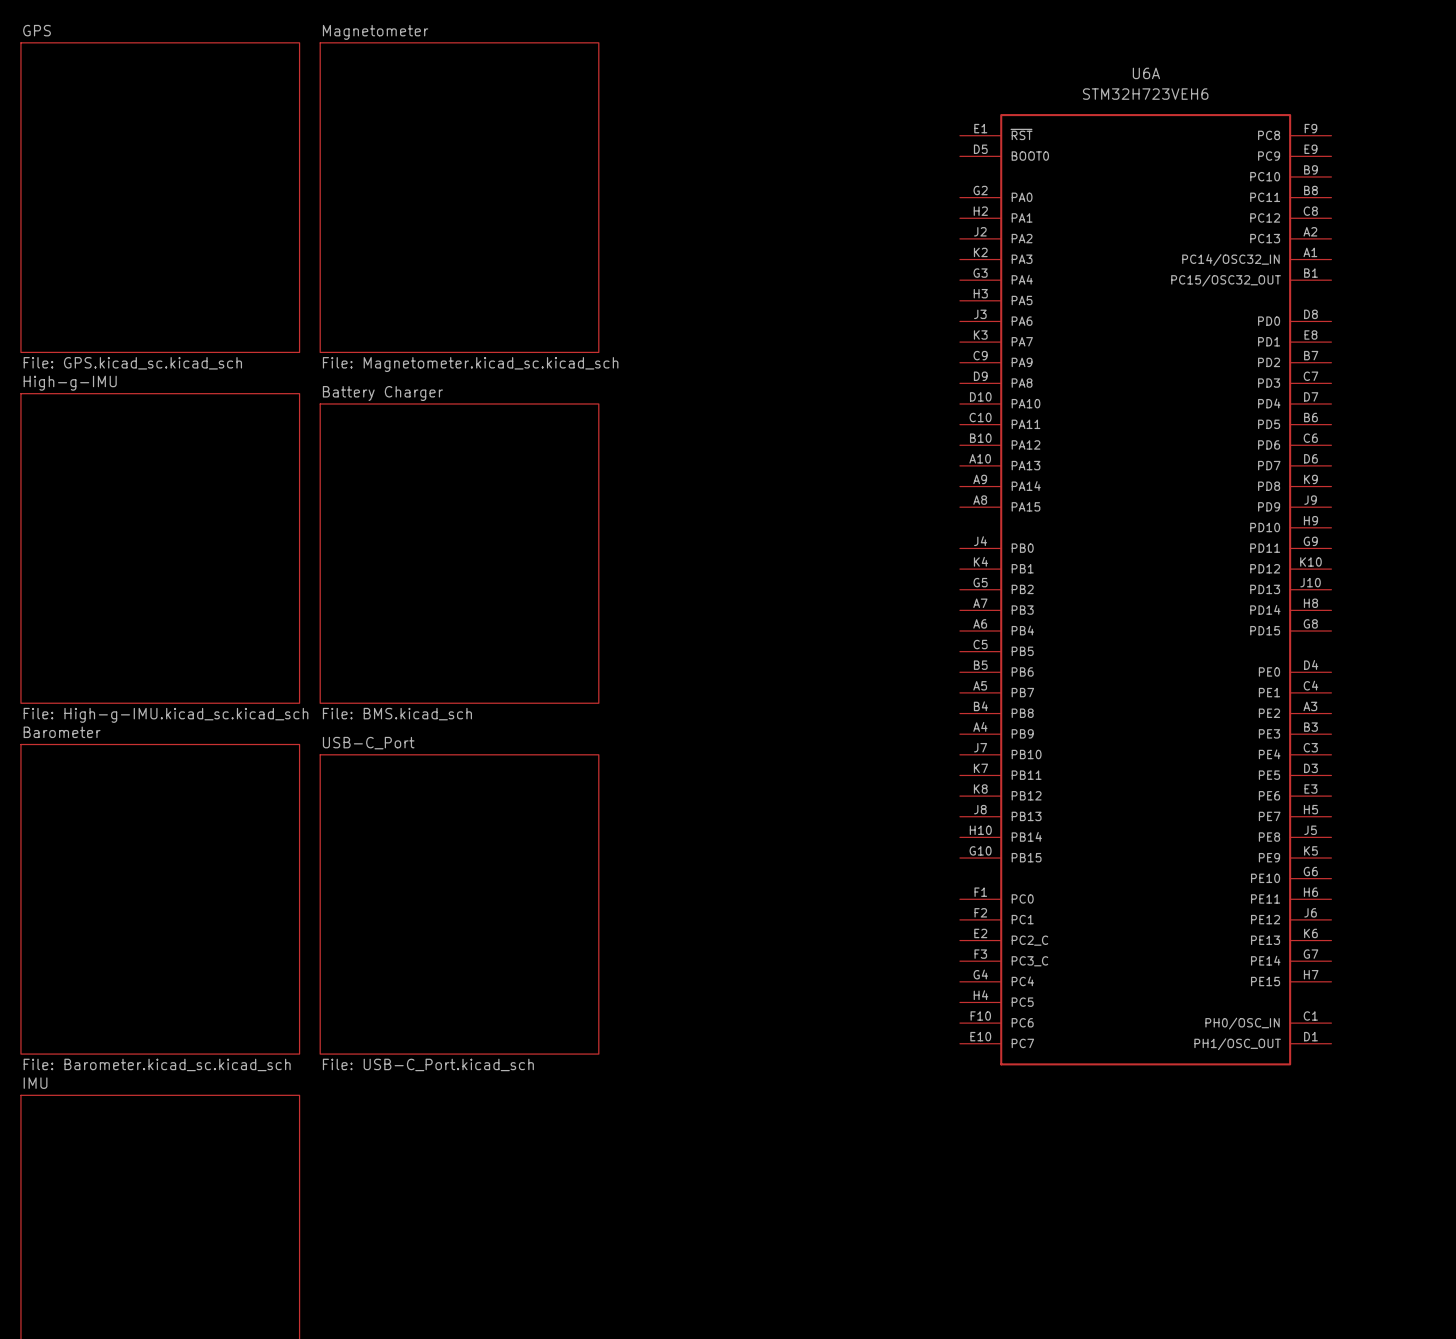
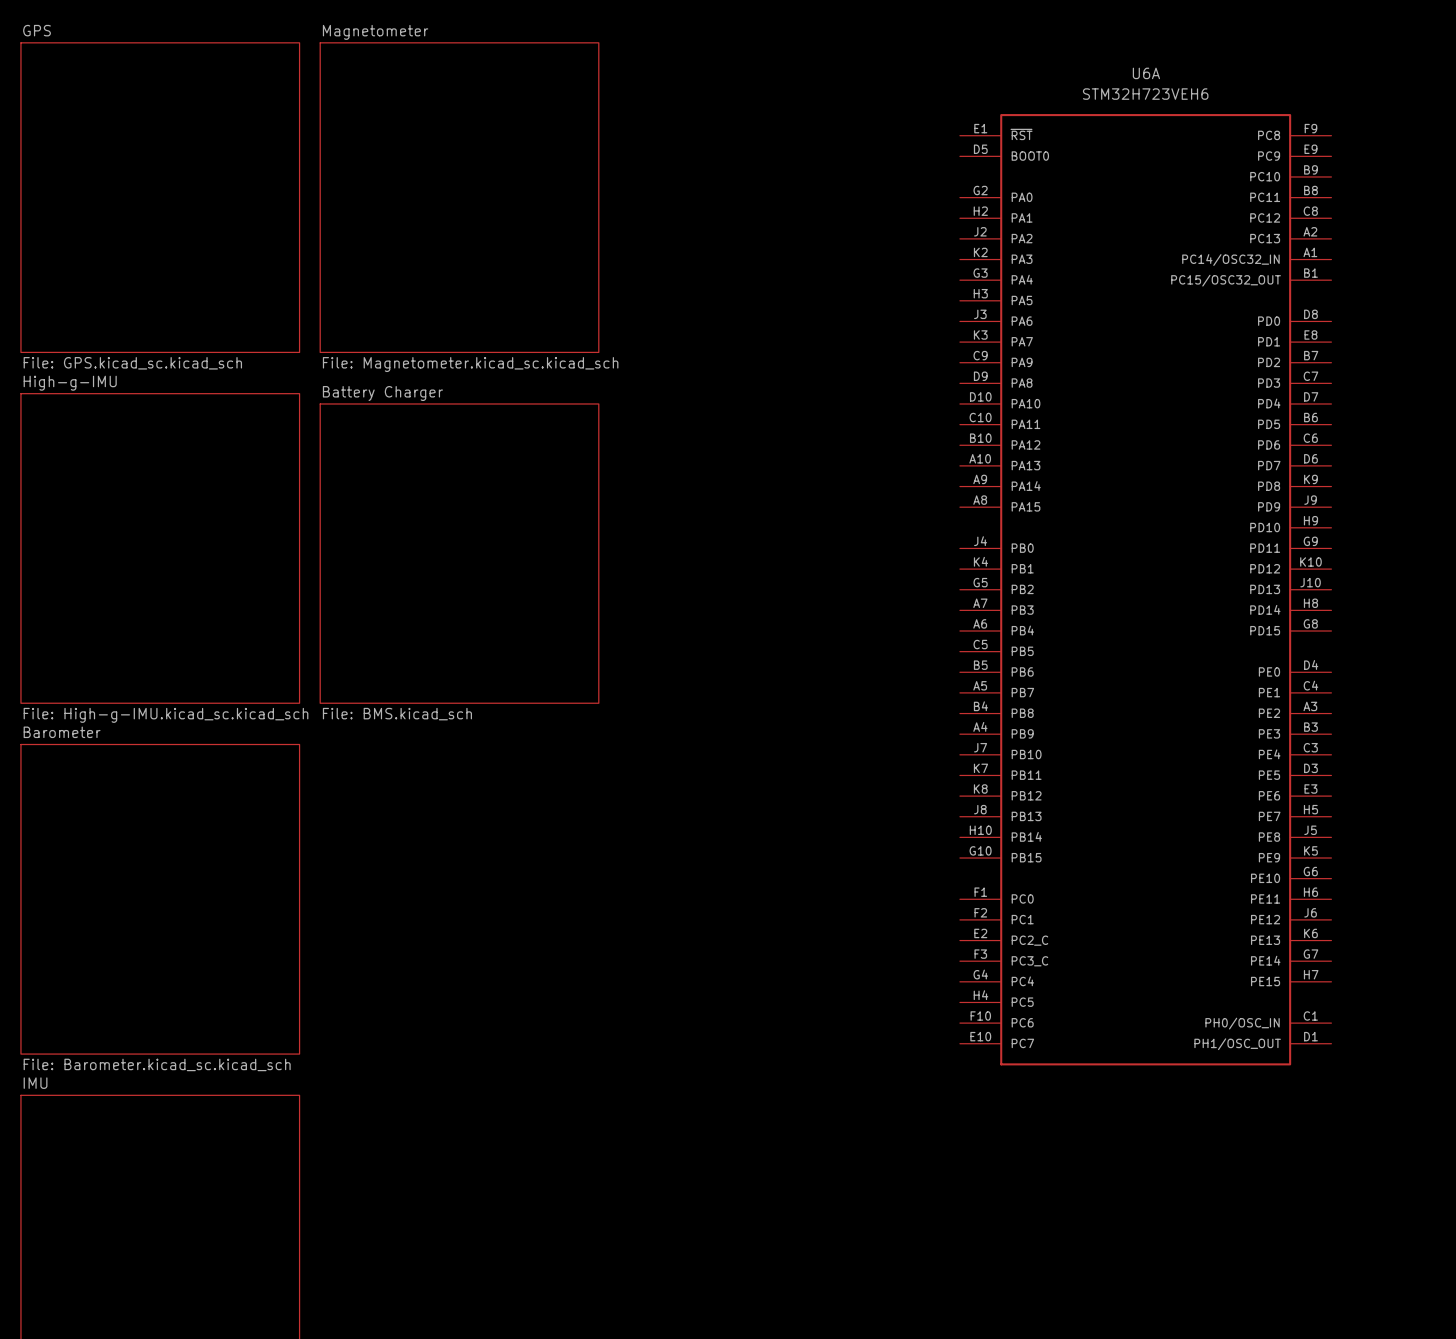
sheet USB-C_Port: File: USB-C_Port.kicad_sch (459, 904) -> none

